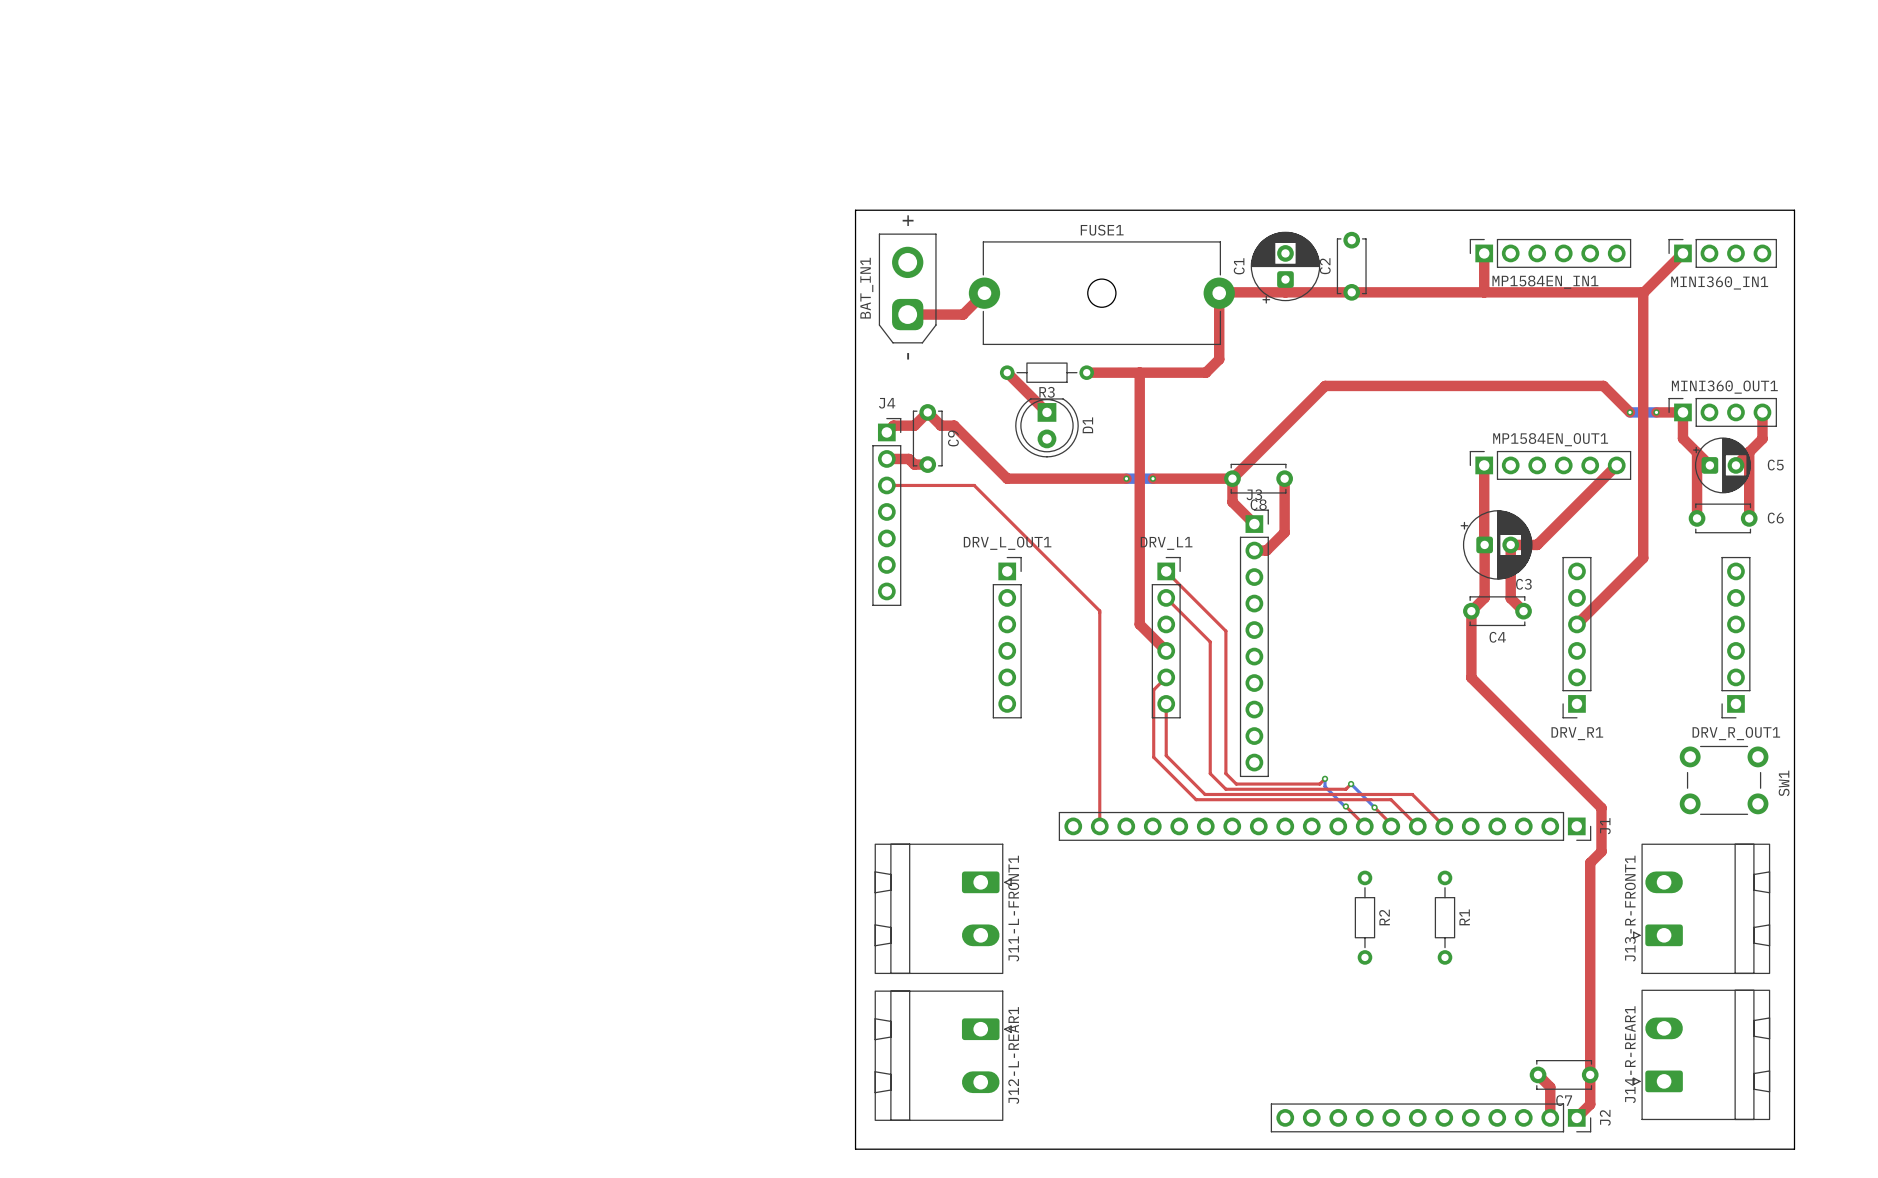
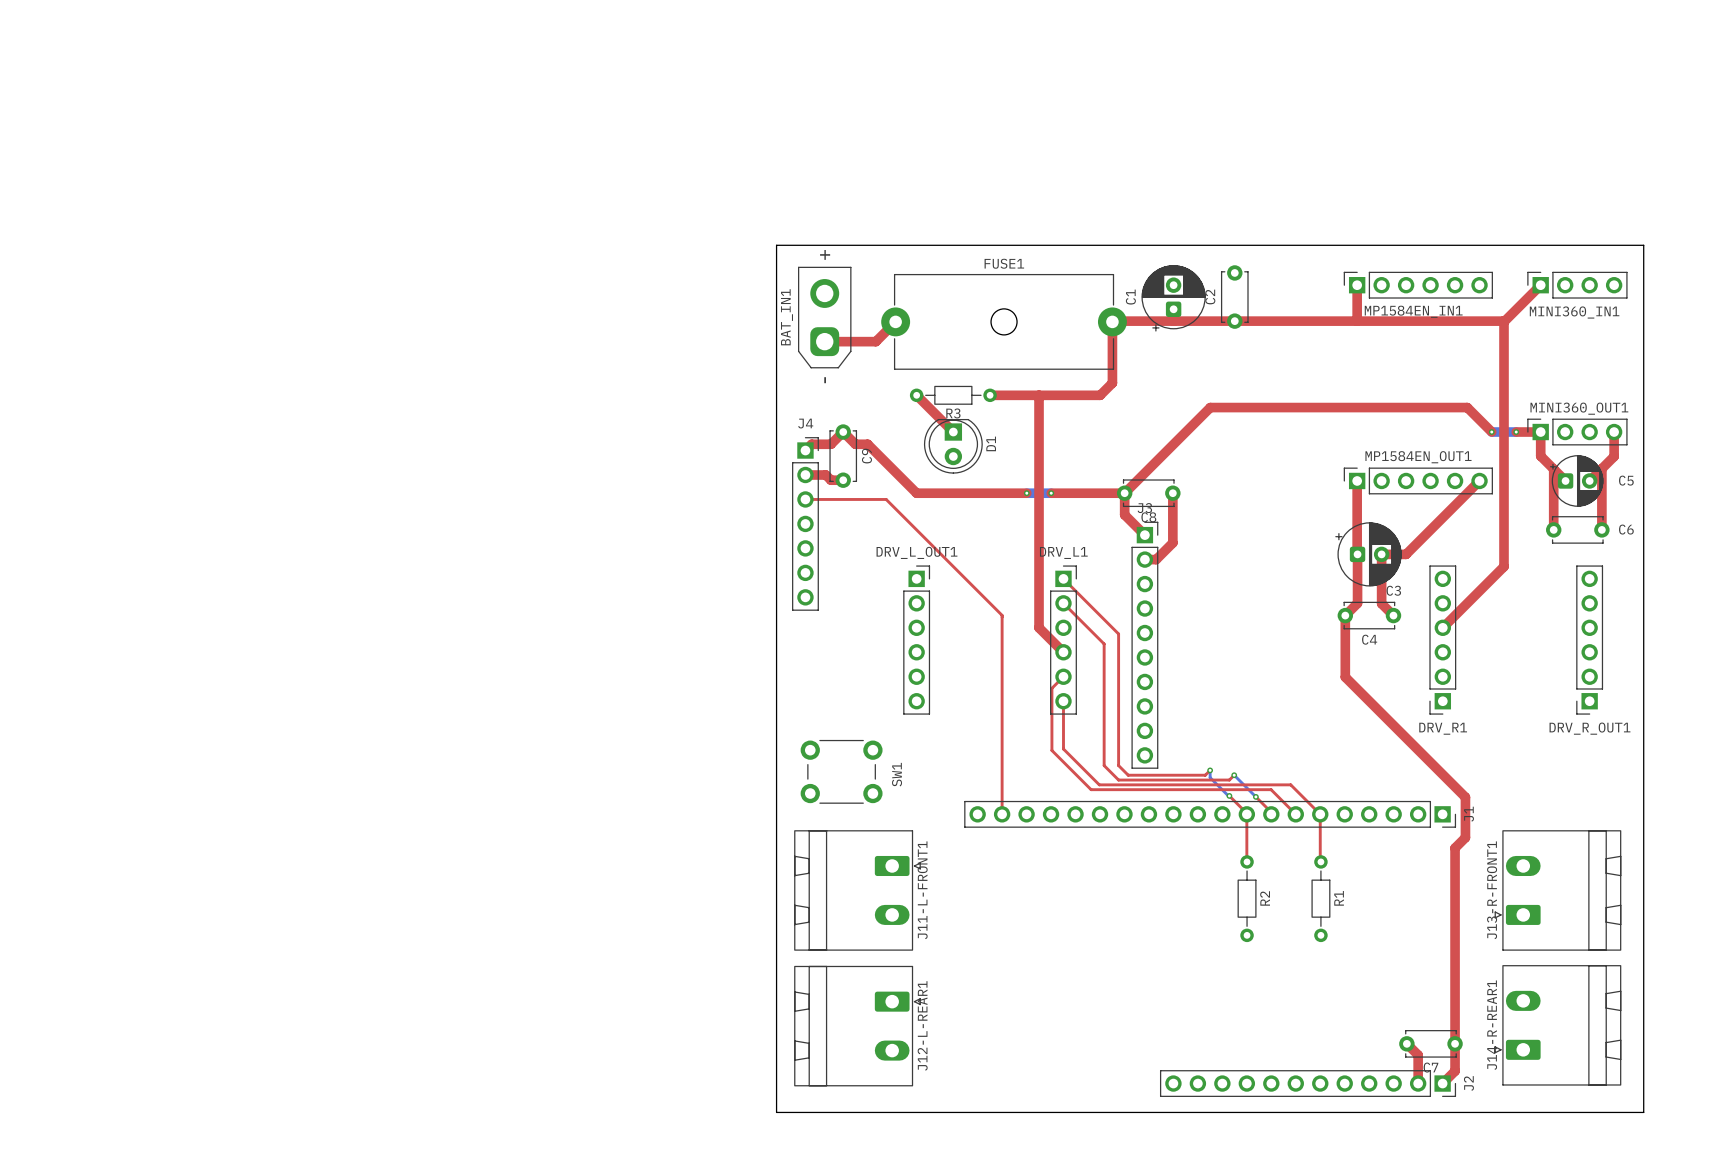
SW1 position: (1724, 780) -> (841, 771)
top track: none -> (1246, 814) (1247, 861)
top track: none -> (1320, 814) (1320, 861)

